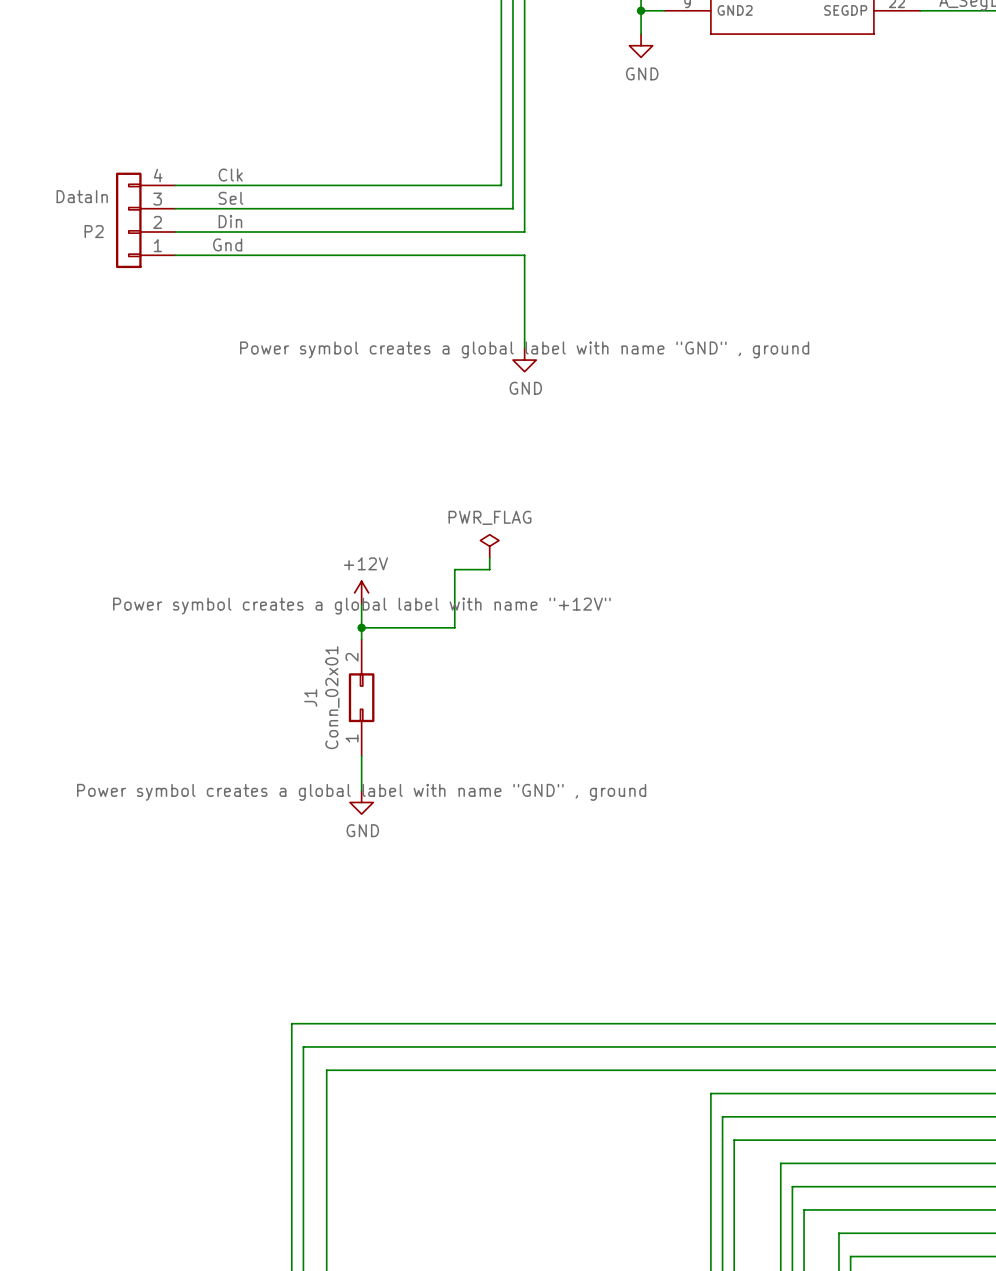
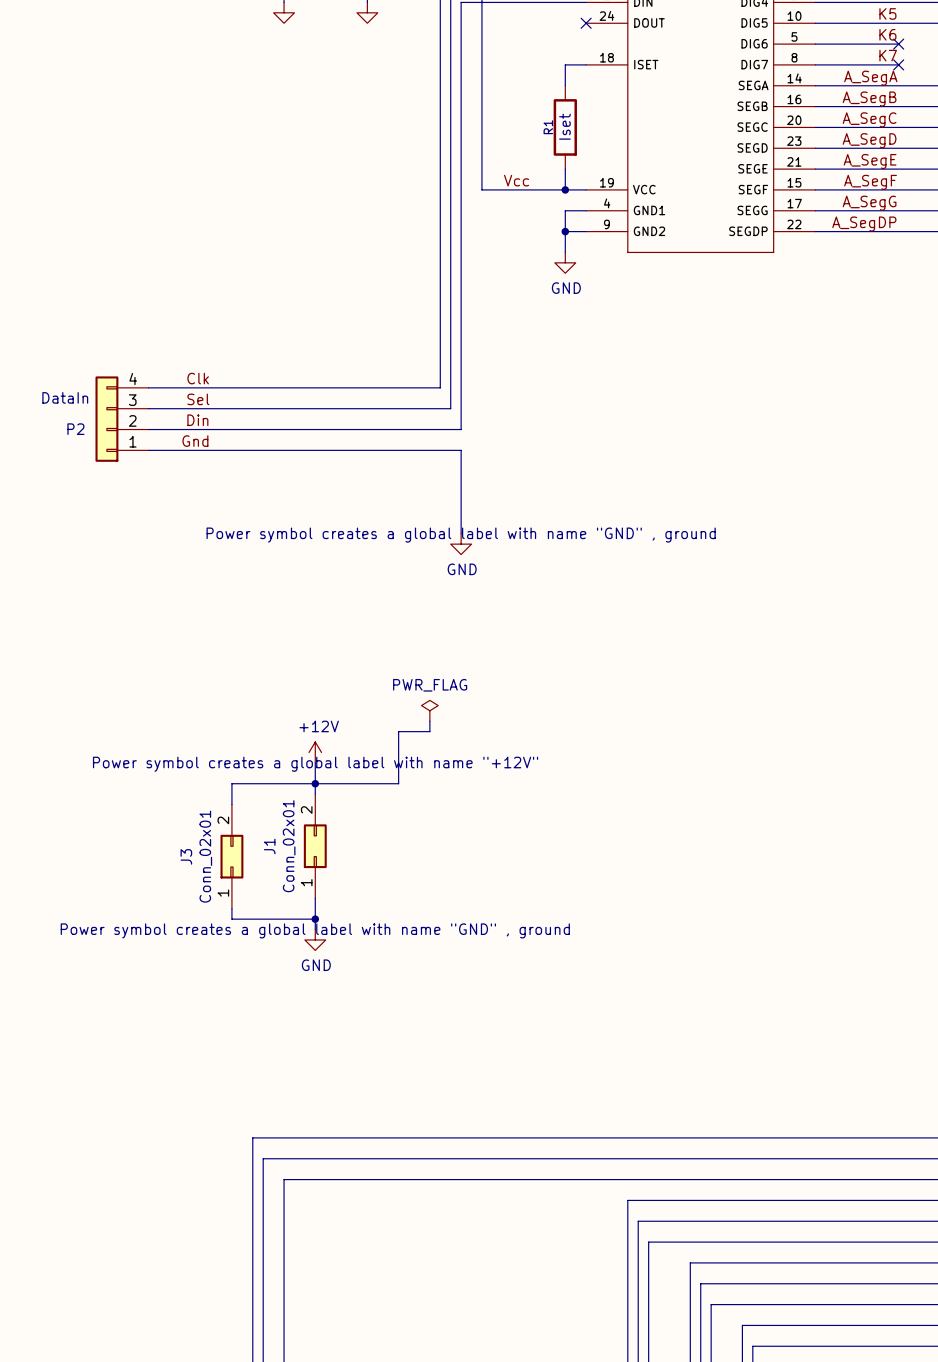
wire: none -> (315, 783) (231, 783) (231, 804)
J3: none -> Conn_02x01 (231, 856)
wire: none -> (231, 908) (231, 919) (315, 919)
junction: none -> (315, 919)

